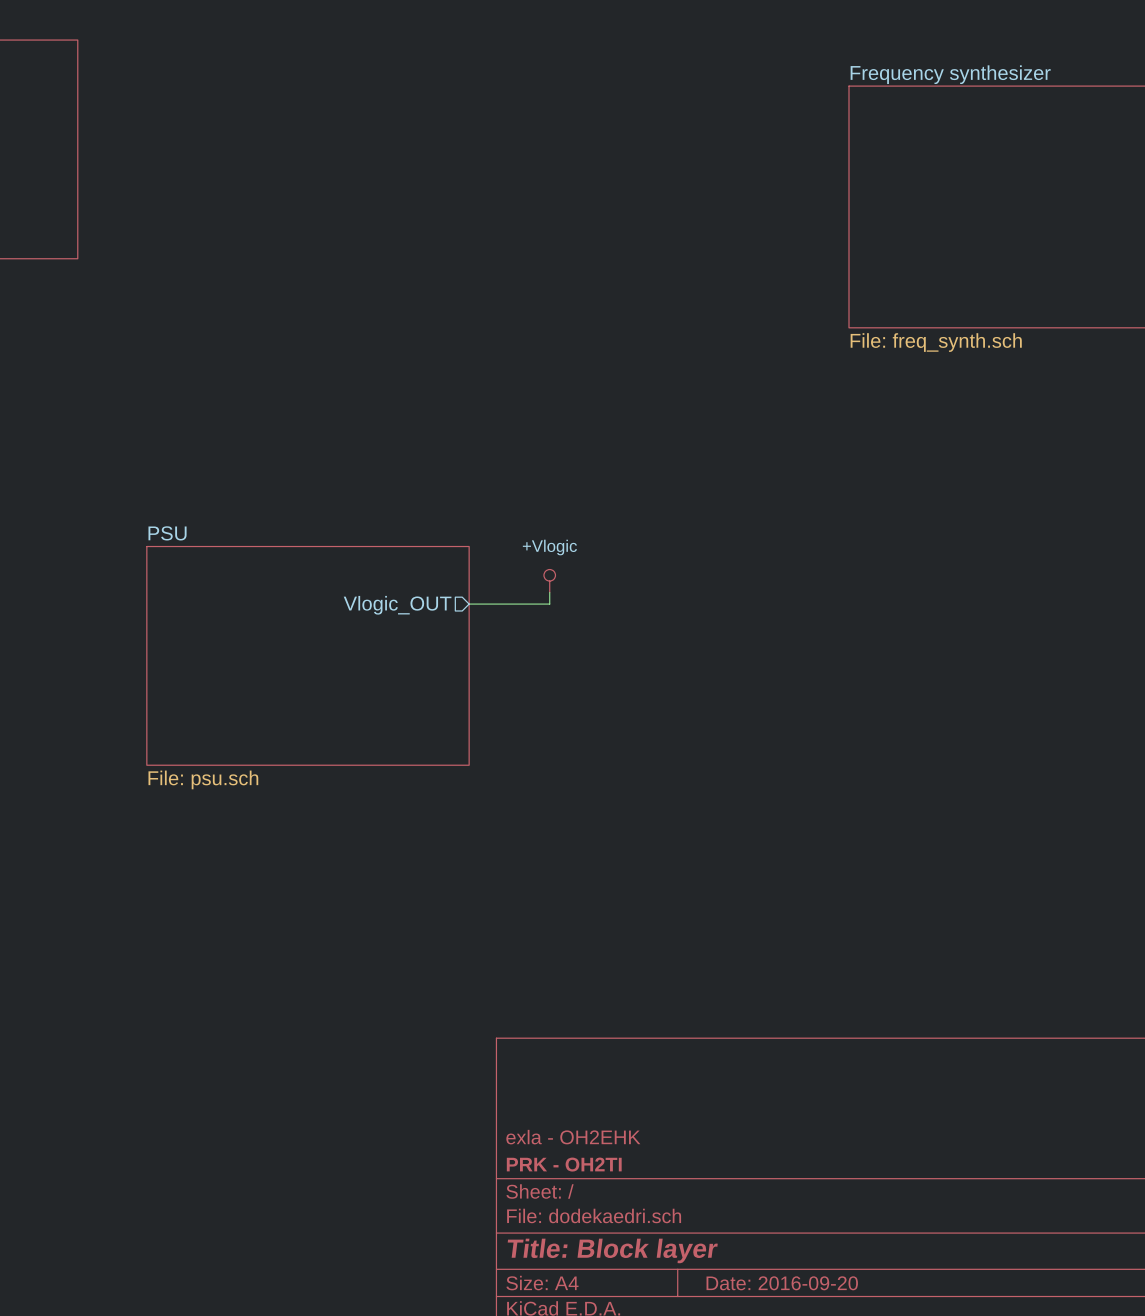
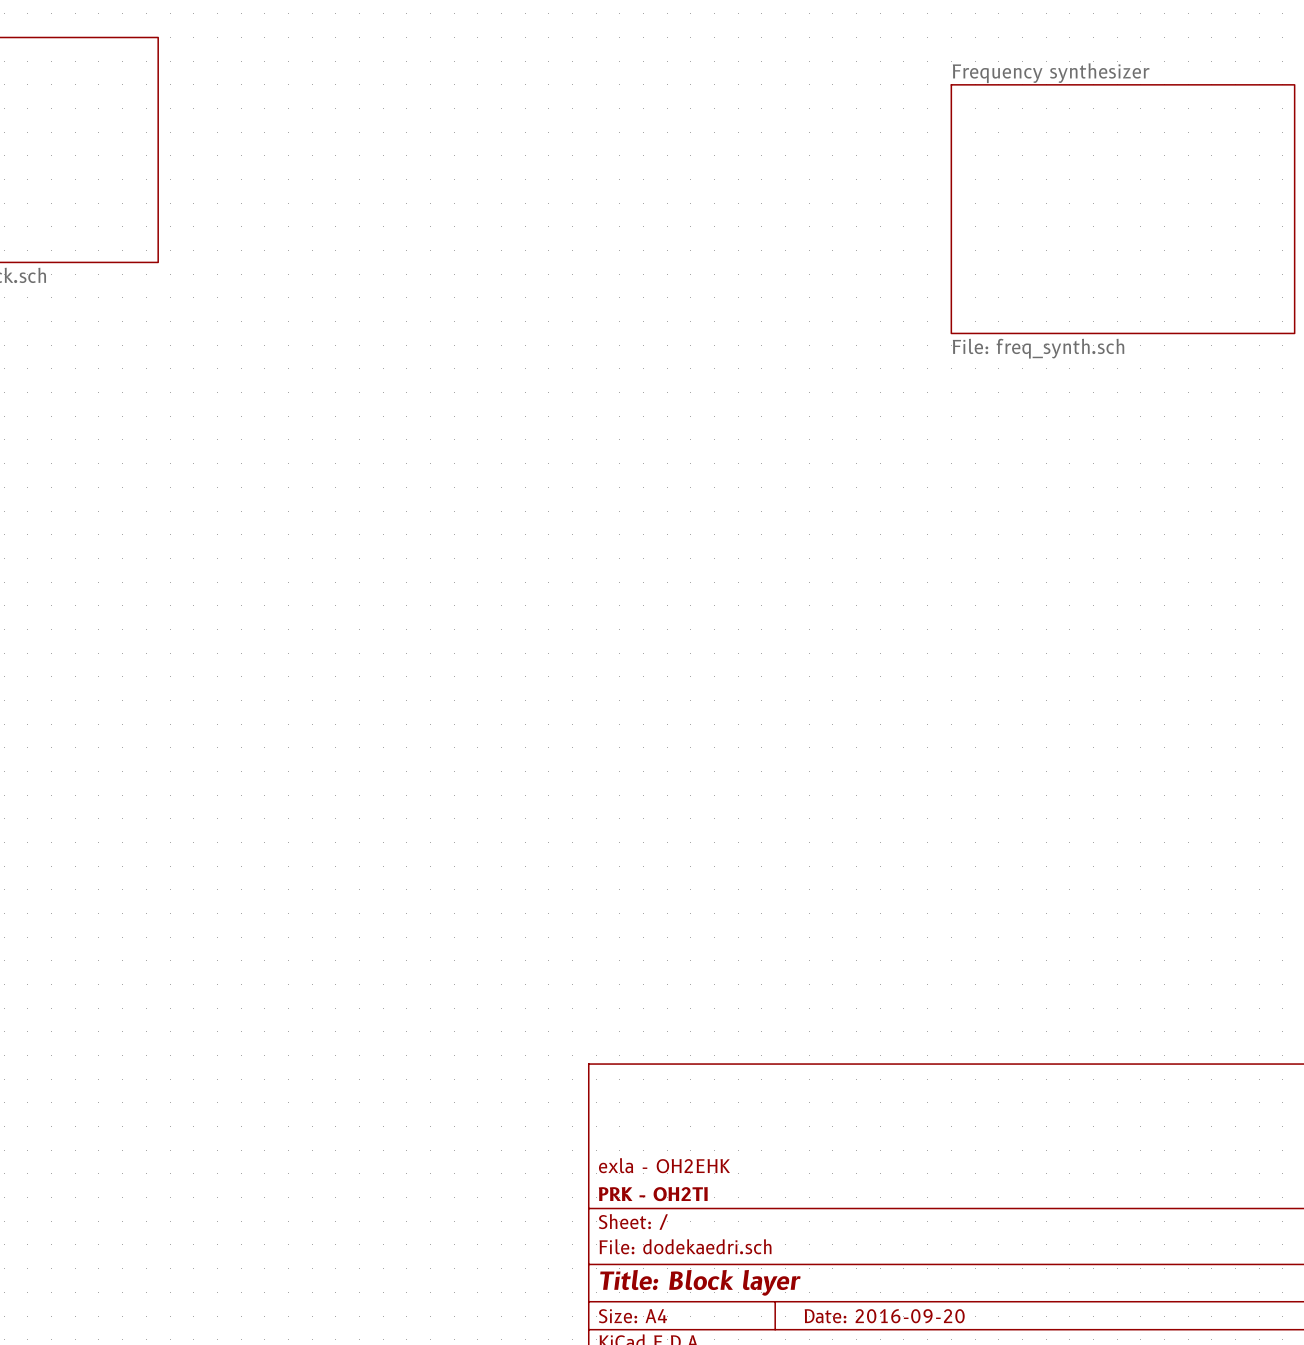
power symbol: +Vlogic (549, 581) -> none
wire: (549, 592) (549, 604) (469, 604) -> none
sheet pin: Vlogic_OUT (397, 605) -> none
sheet PSU: File: psu.sch (307, 655) -> none

